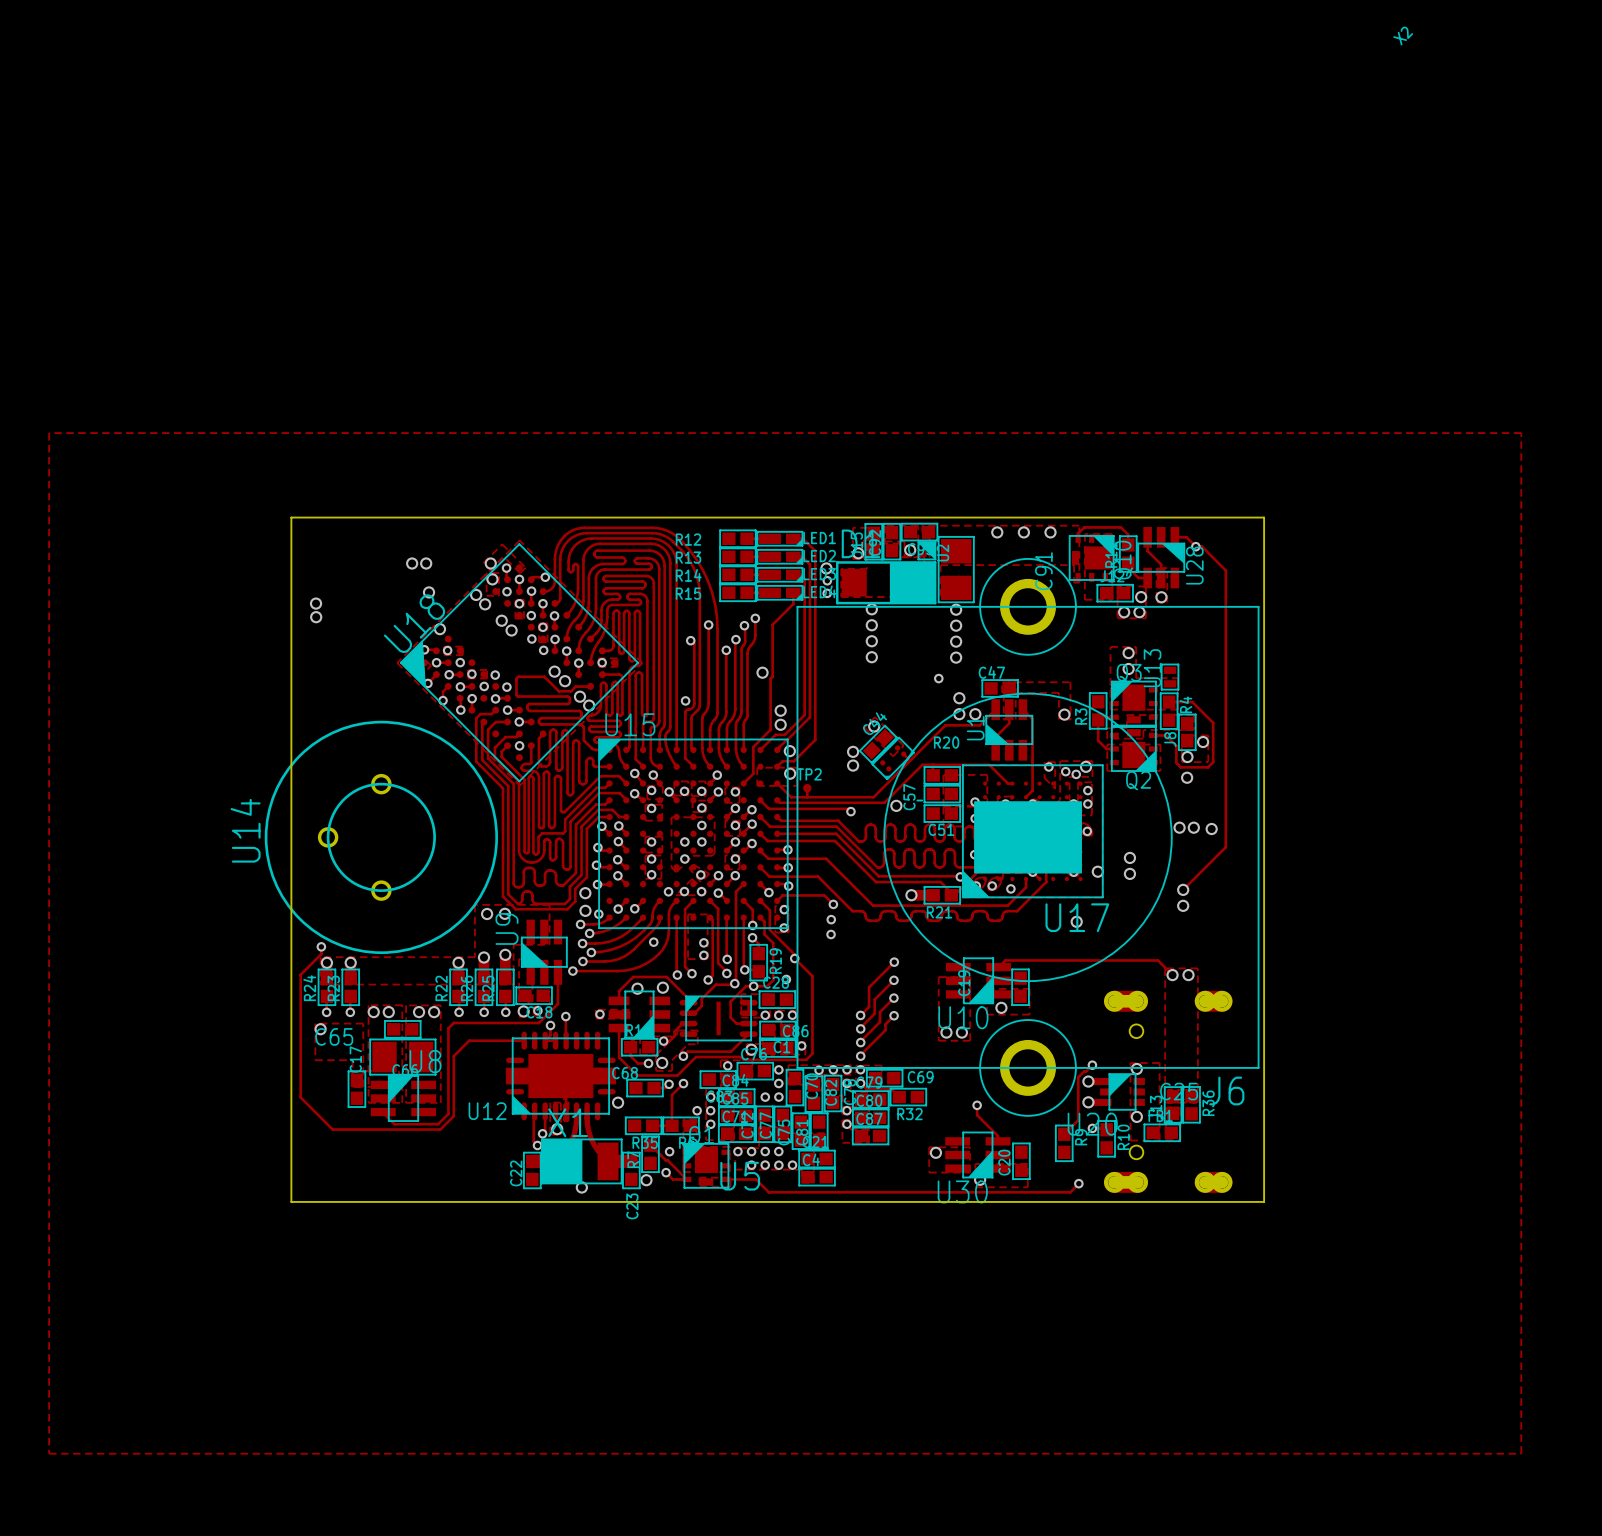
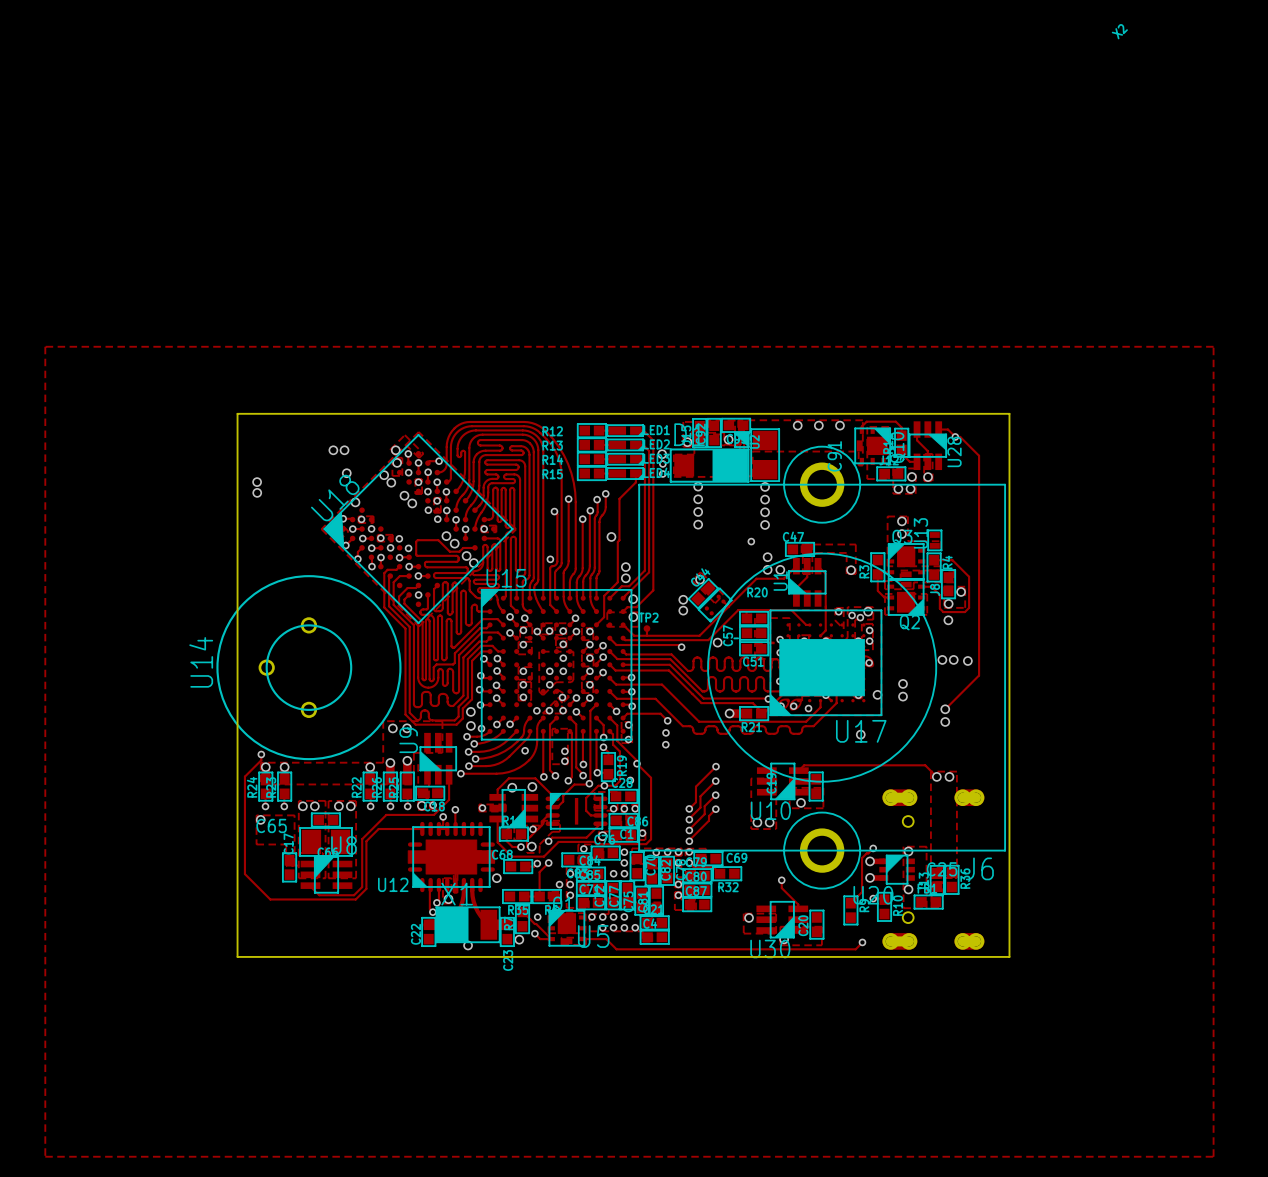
track: (478, 1022) (453, 1022) (448, 1028) (448, 1053) -> (386, 814) (362, 839)

